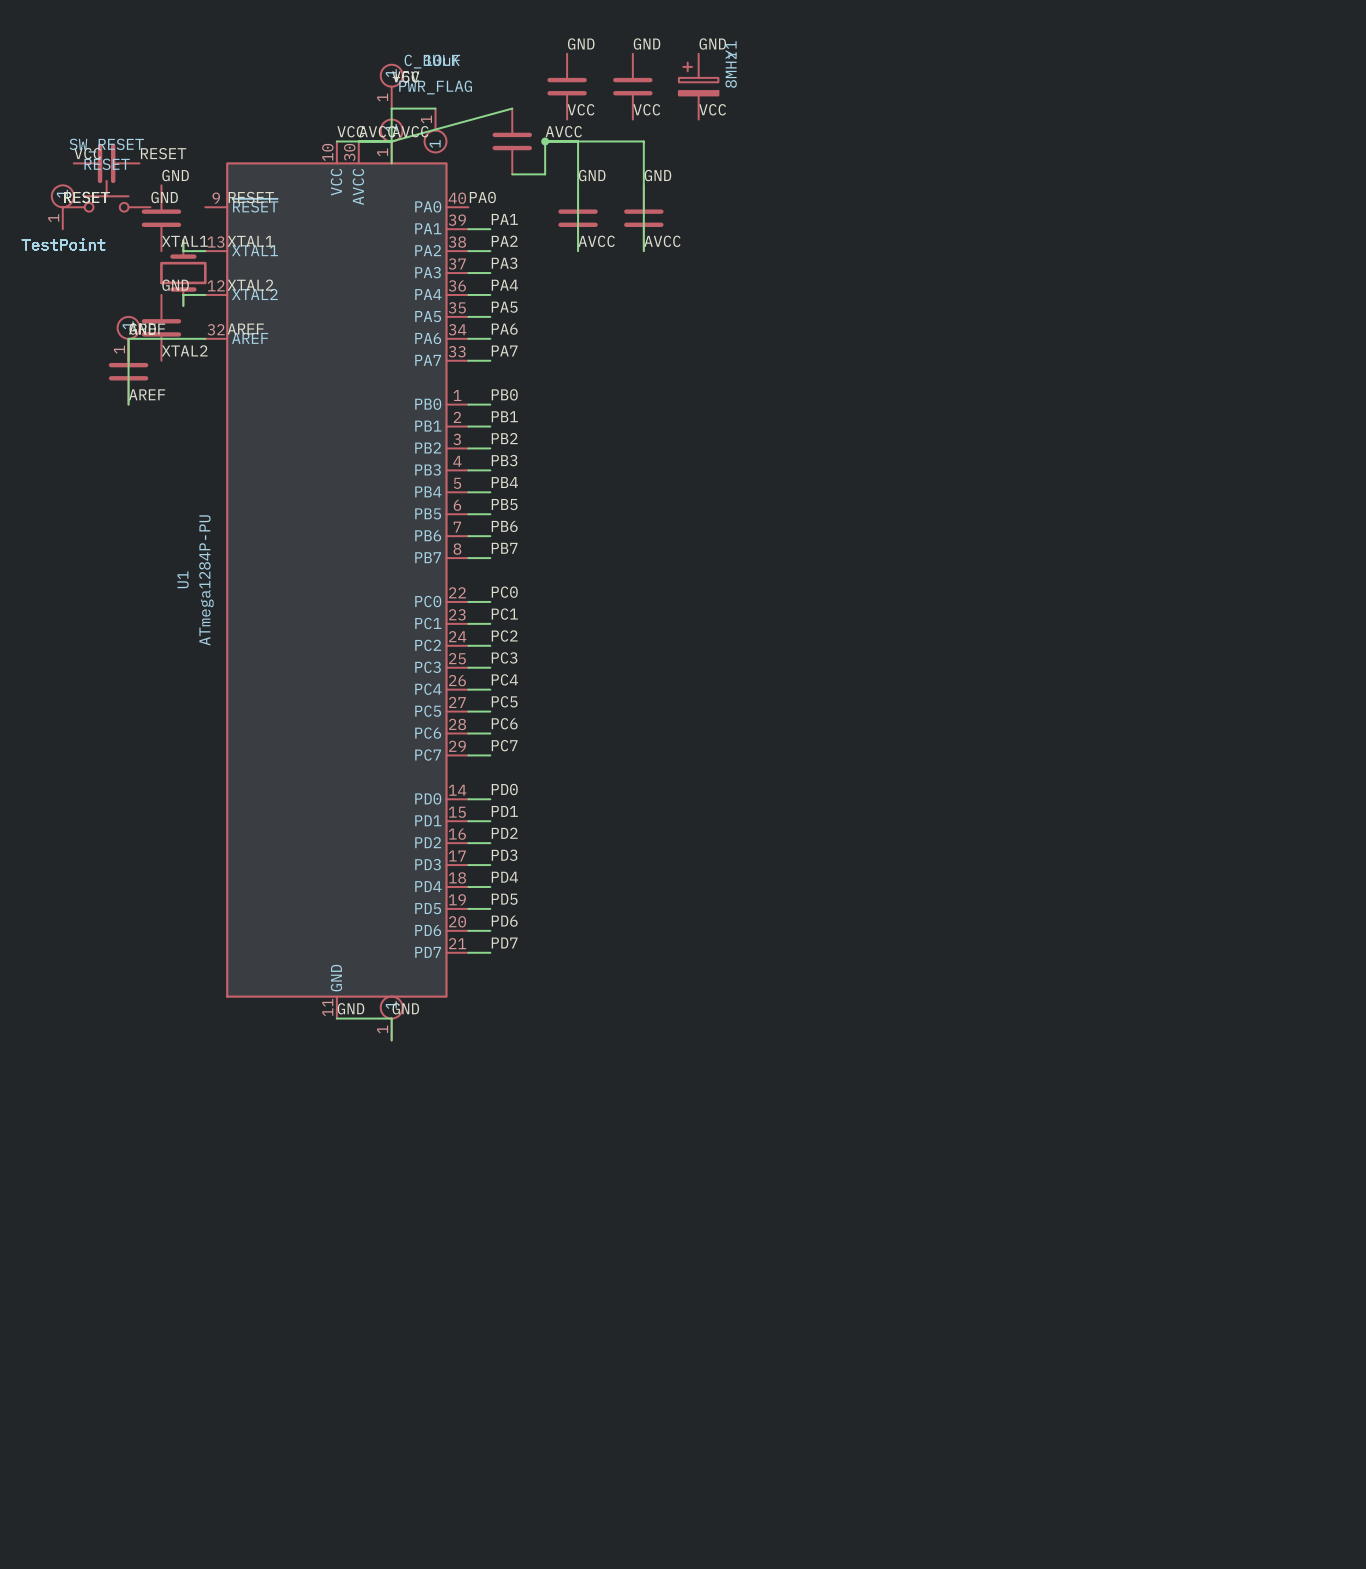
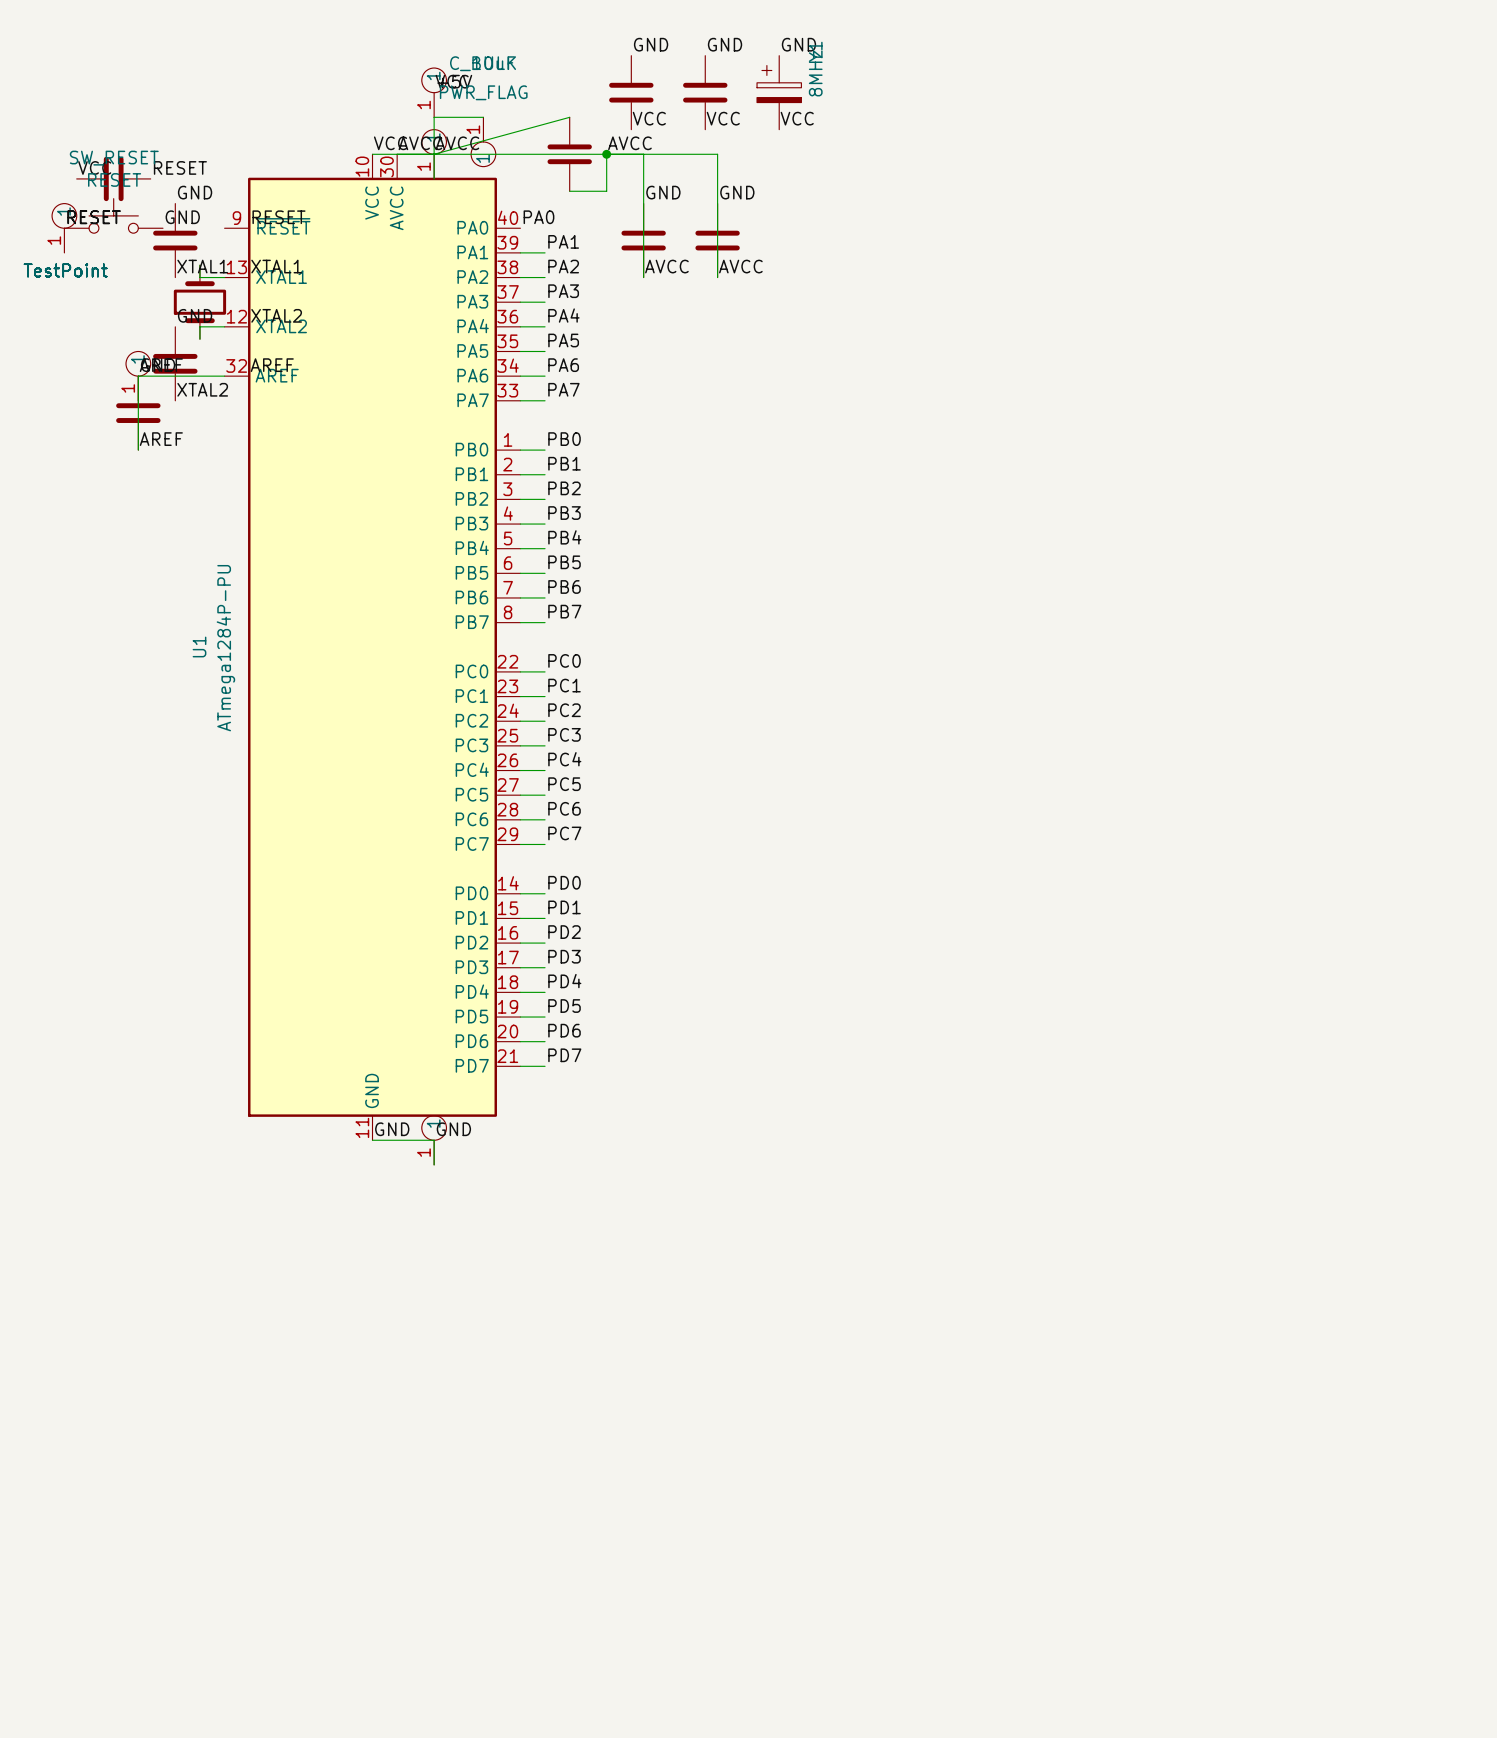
wire: none -> (434, 154) (606, 154)

